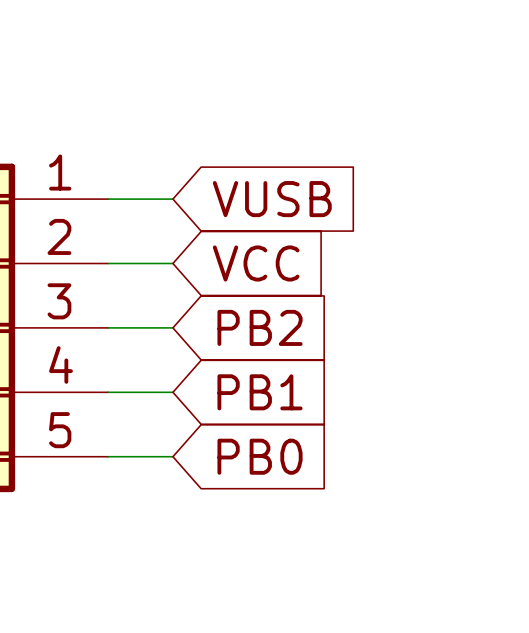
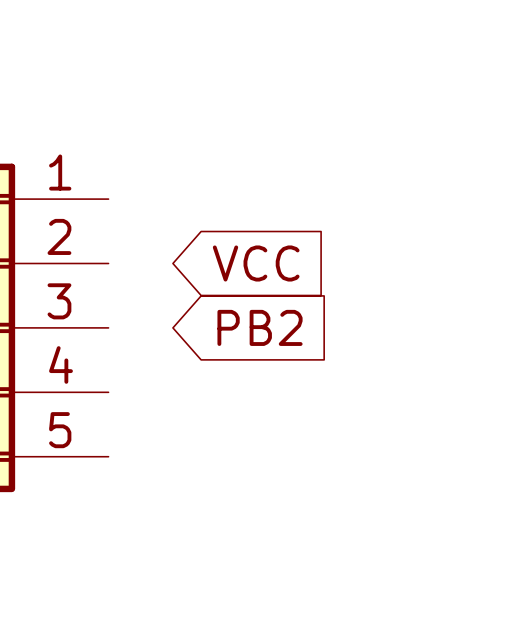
wire: (108, 199) (172, 199) -> none
global label: VUSB (272, 199) -> none
wire: (108, 263) (172, 263) -> none
wire: (108, 327) (172, 327) -> none
wire: (108, 392) (172, 392) -> none
global label: PB1 (260, 392) -> none
wire: (108, 456) (172, 456) -> none
global label: PB0 (260, 456) -> none

